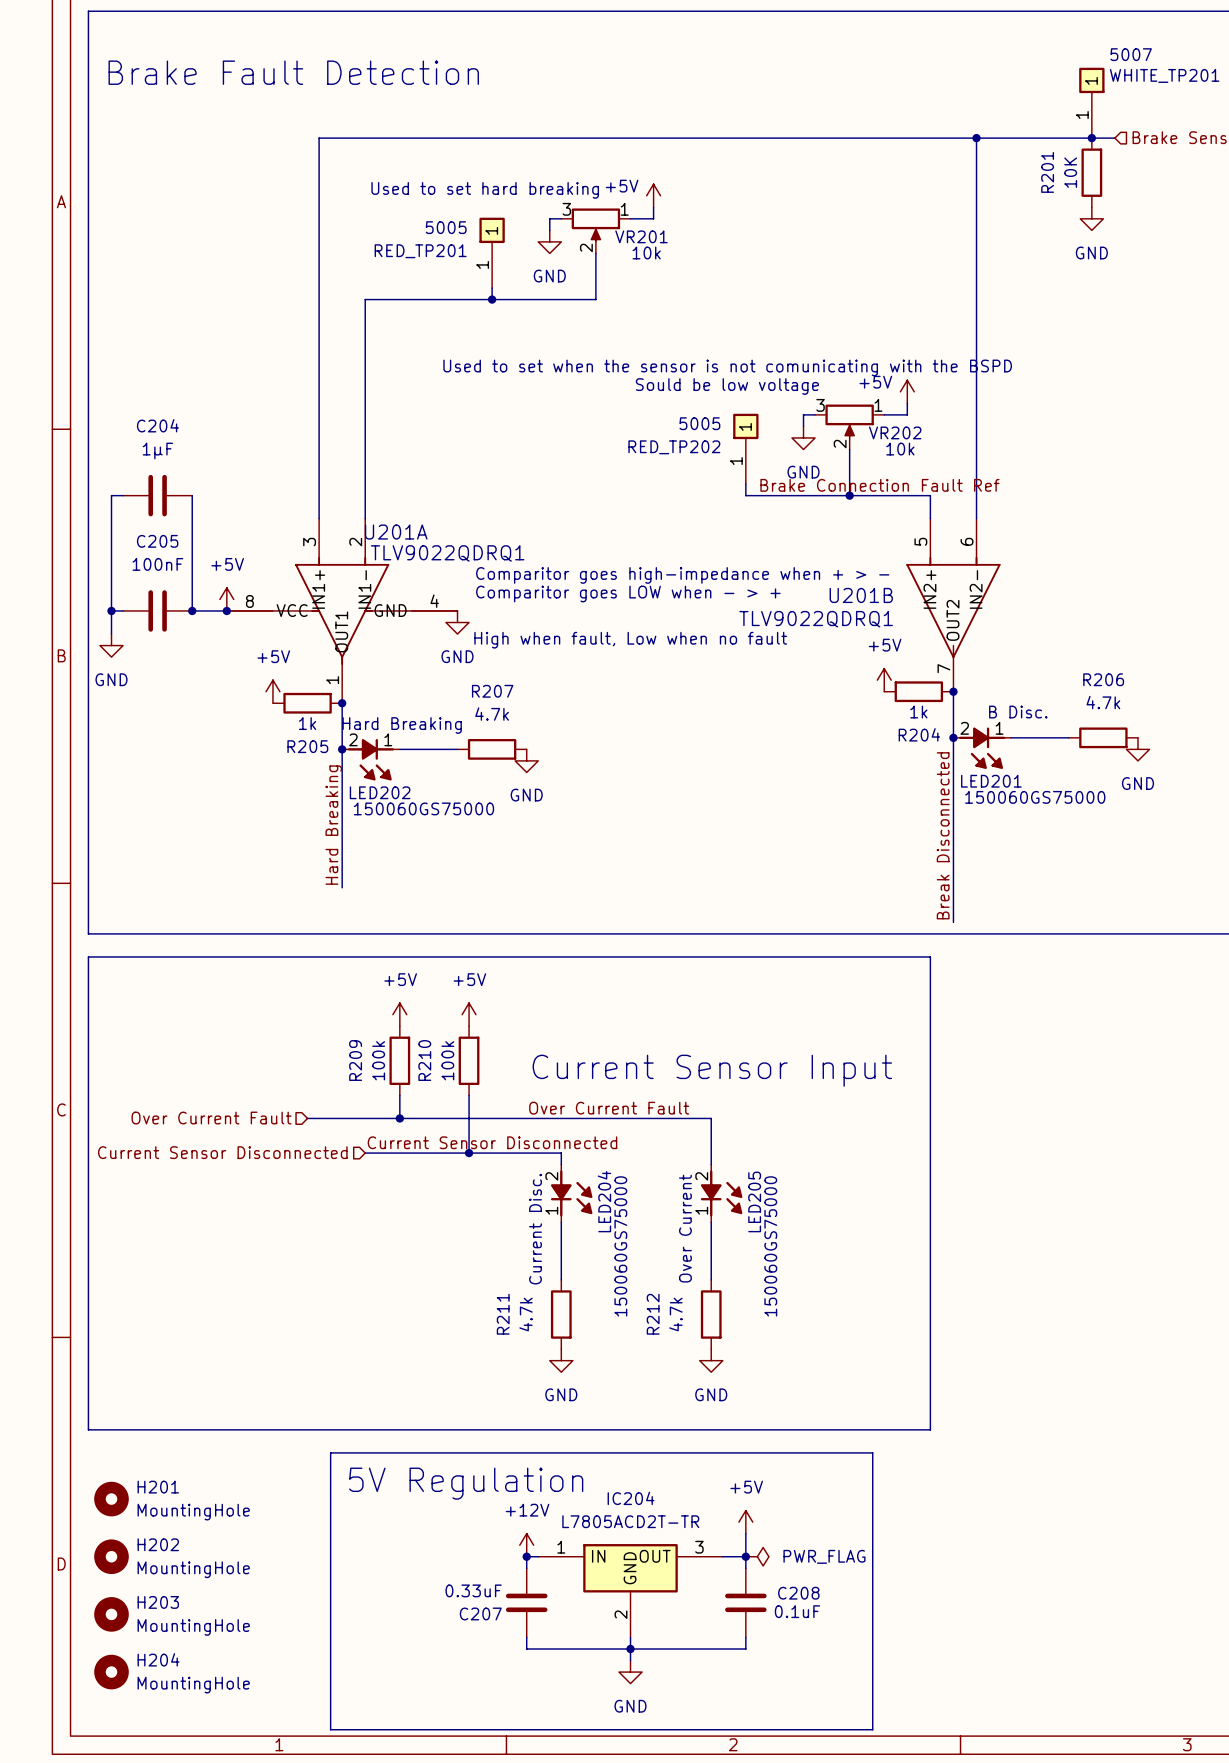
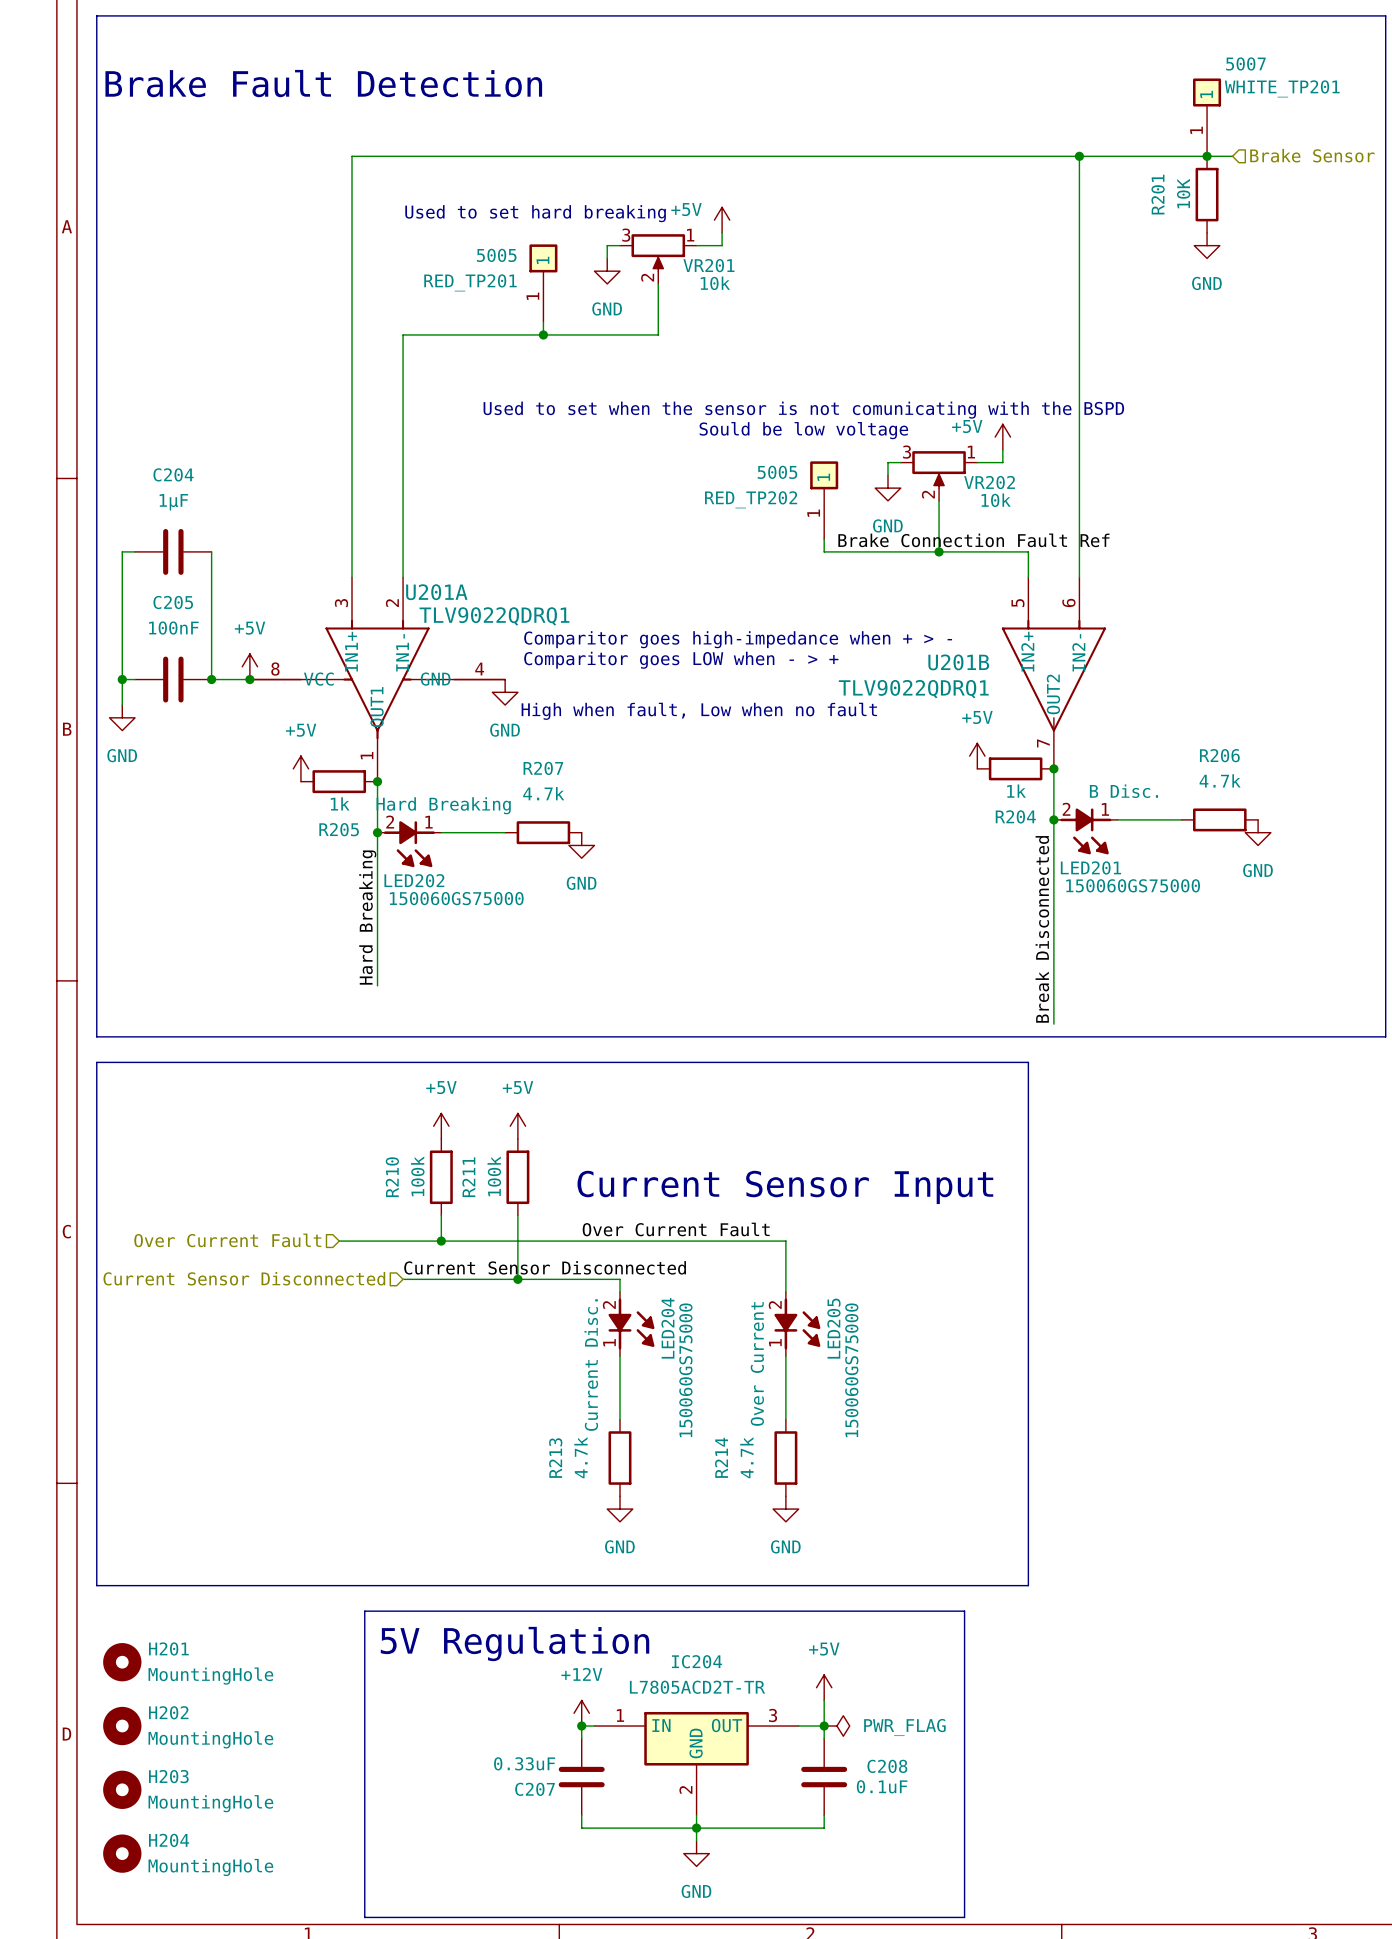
R209 name: R209 (355, 1060) -> R210 (392, 1177)
R210 name: R210 (424, 1060) -> R211 (468, 1177)
R211 name: R211 (503, 1314) -> R213 (555, 1458)
R212 name: R212 (653, 1314) -> R214 (721, 1457)

